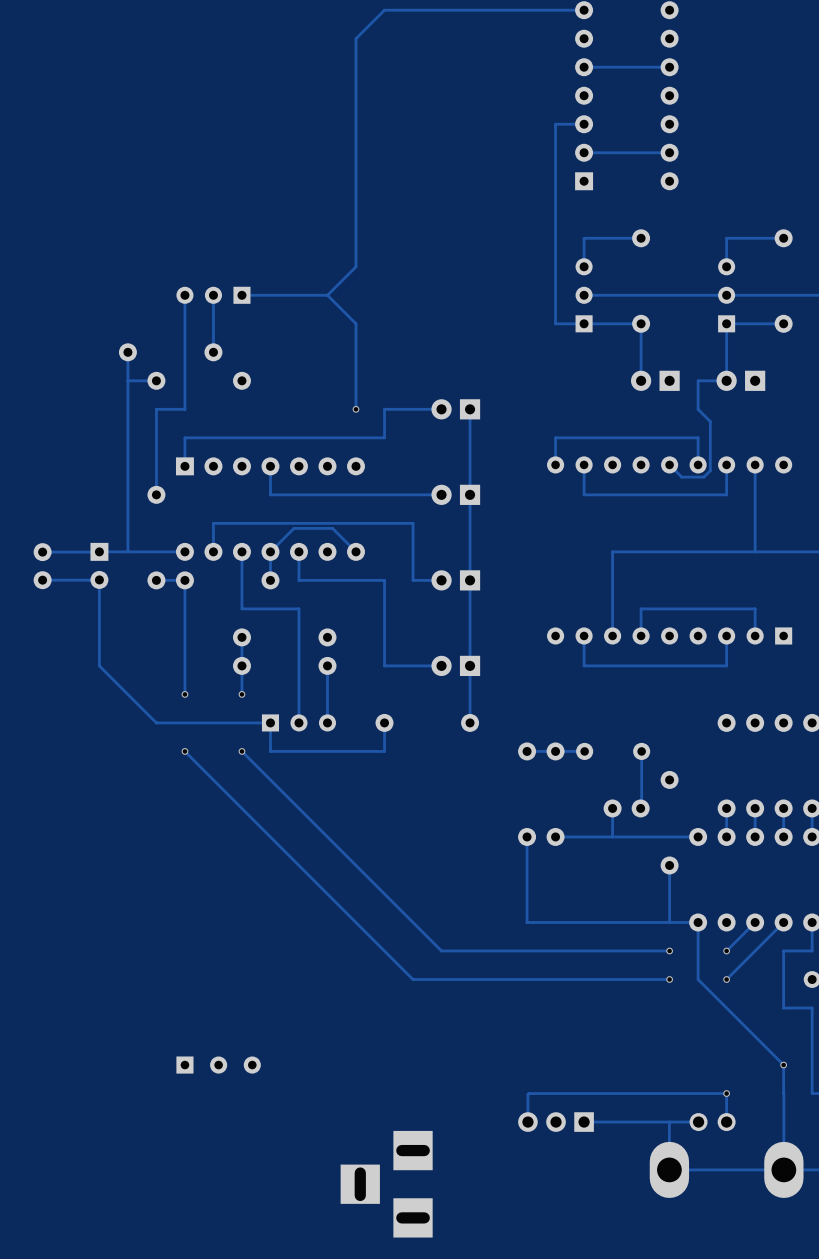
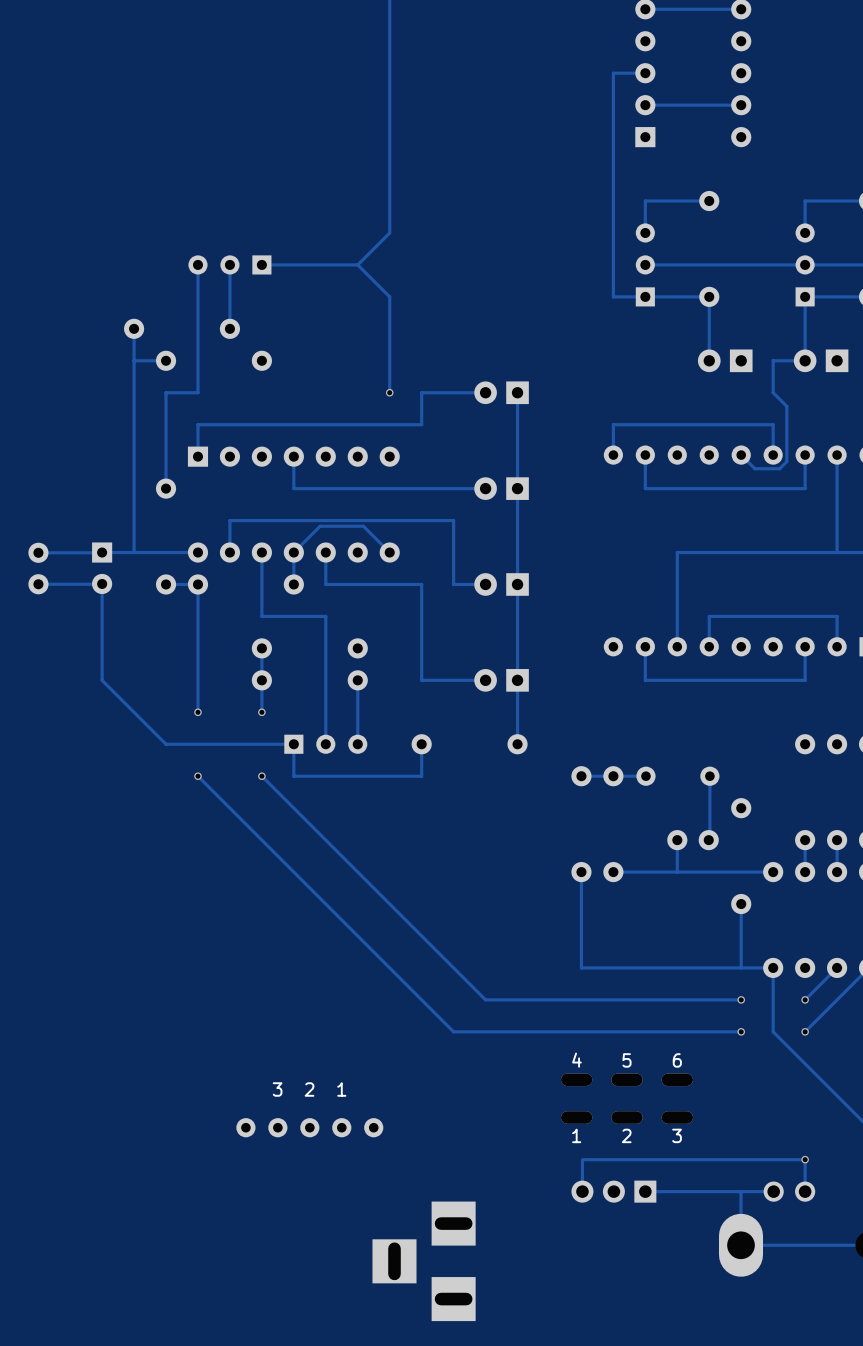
part: none -> (626, 1098)
part: (218, 1065) -> none
part: none -> (309, 1127)

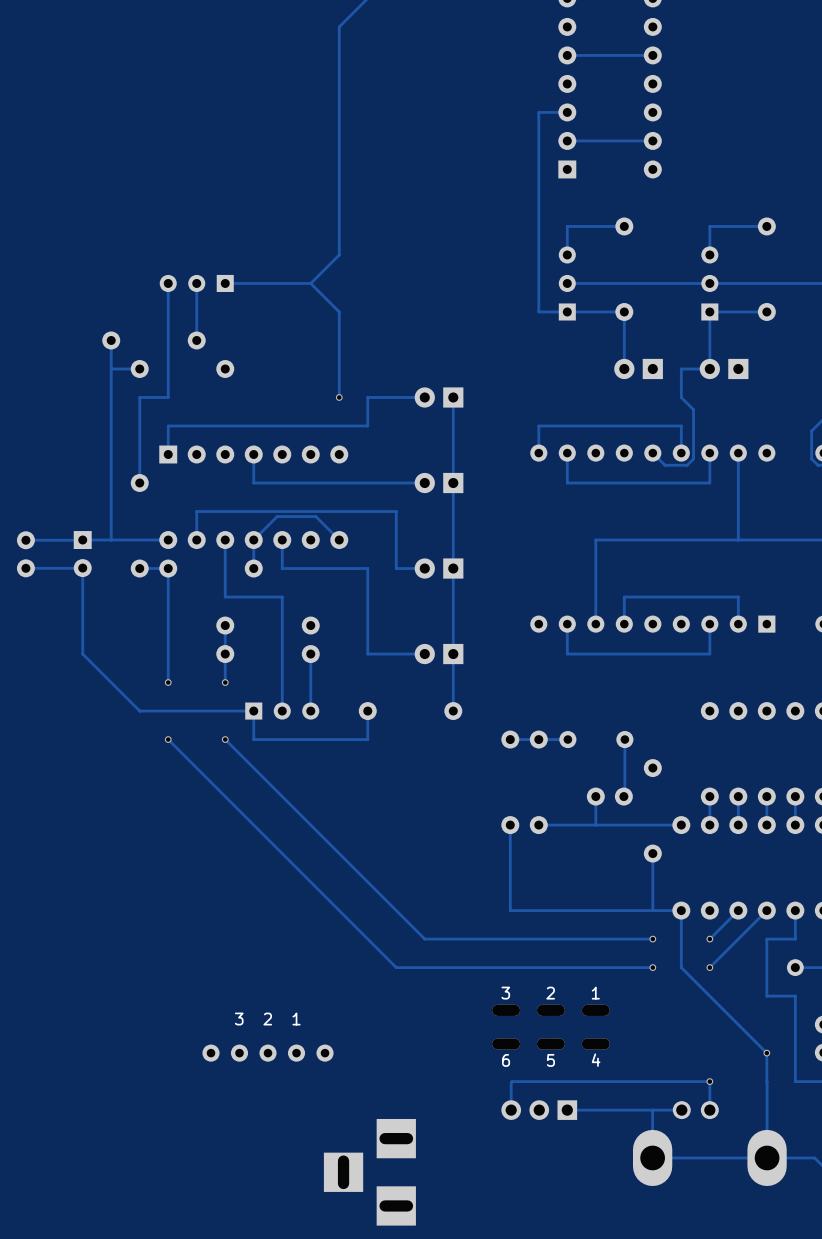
part rotation: 0° (626, 1098) -> 180° (550, 1027)

